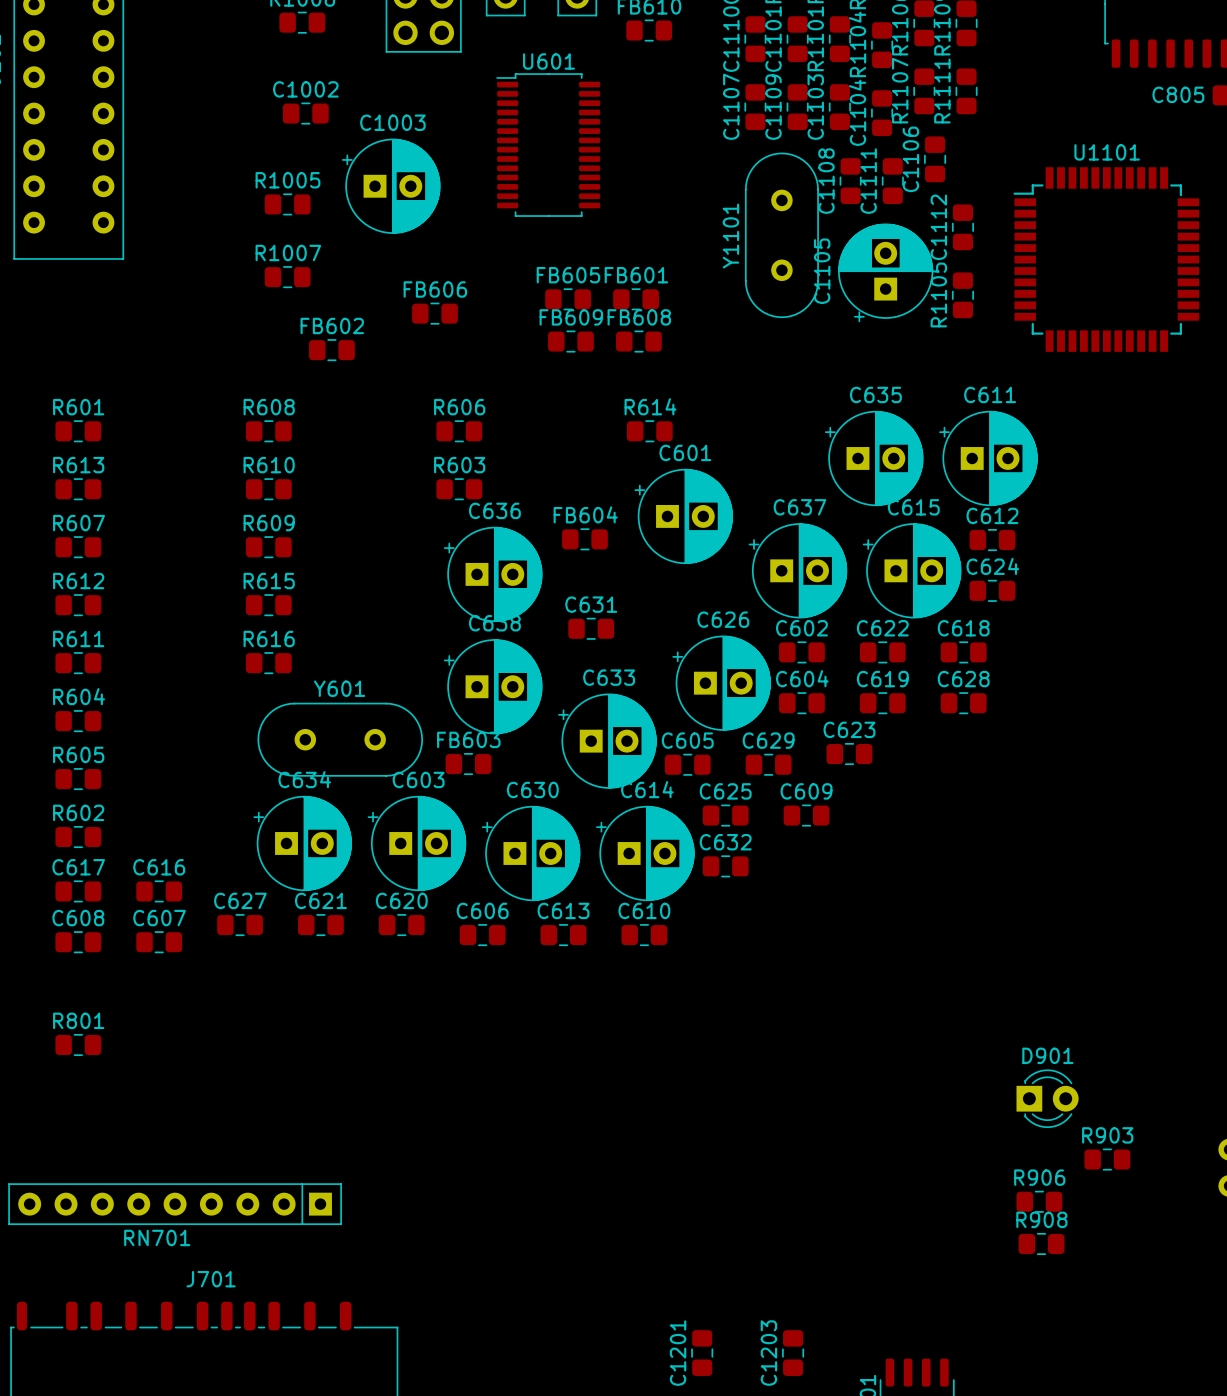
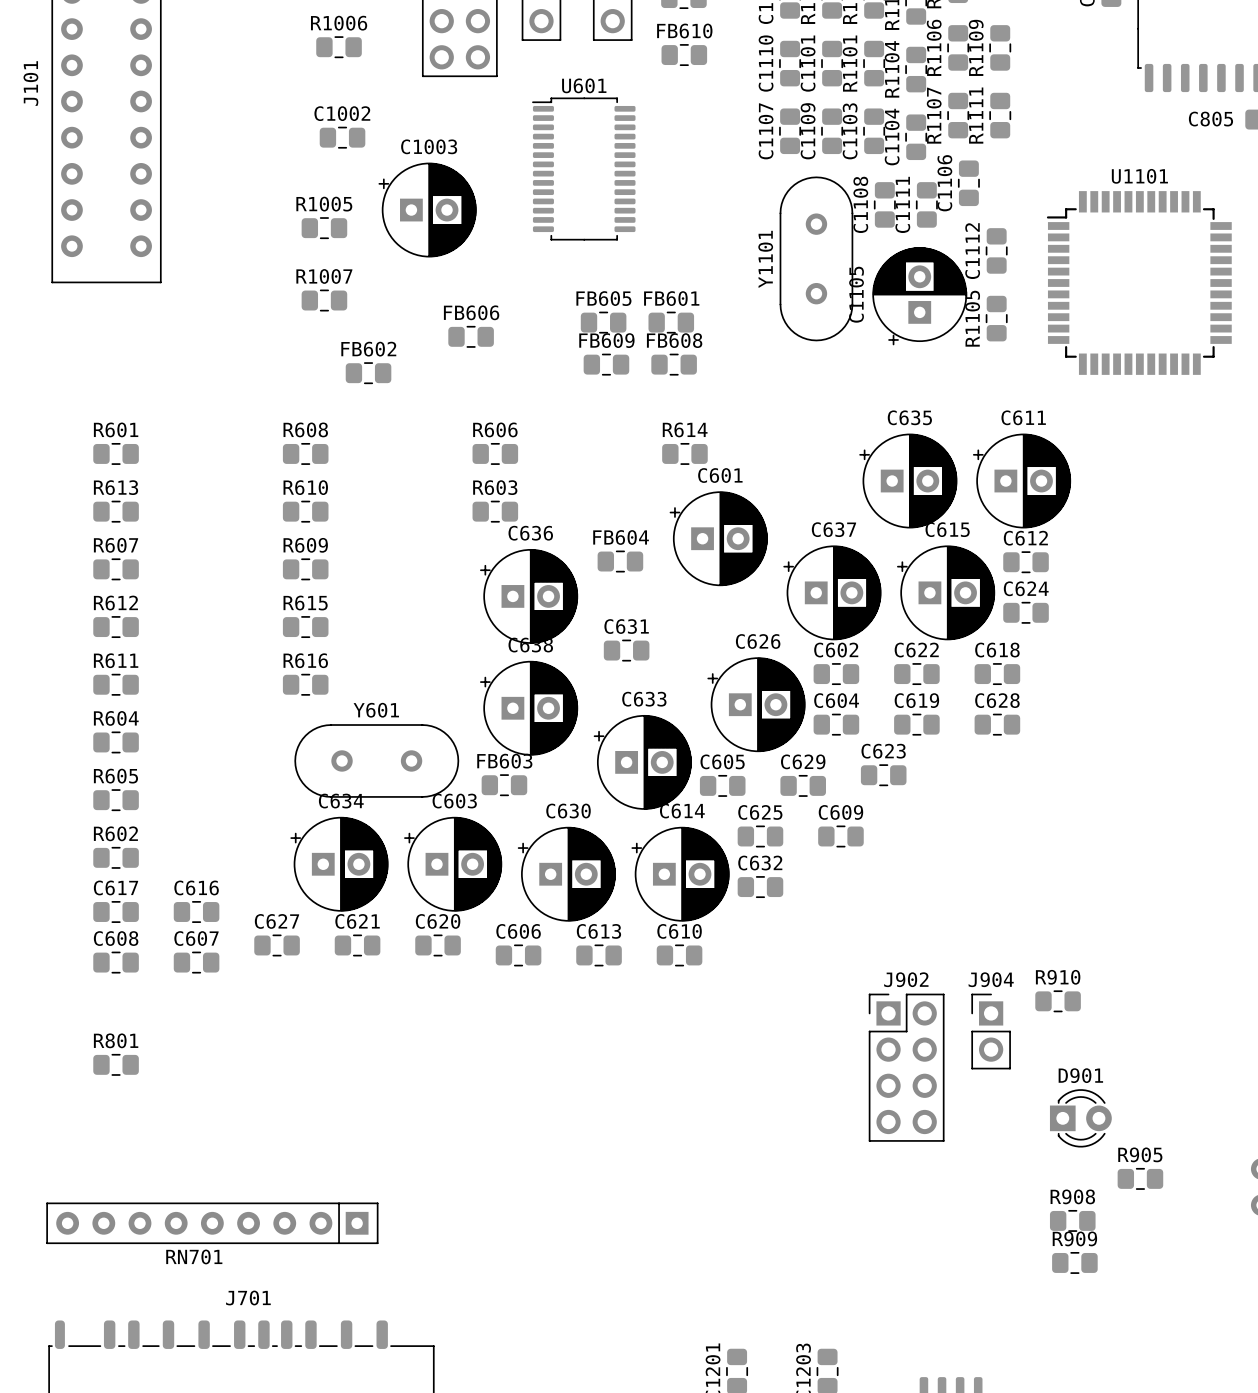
R910: none -> (1058, 1001)
J904: none -> (991, 1031)
J902: none -> (906, 1067)
R903 name: R903 (1107, 1135) -> R905 (1140, 1154)
R906 name: R906 (1039, 1177) -> R908 (1072, 1196)
R908 name: R908 (1041, 1219) -> R909 (1074, 1238)

